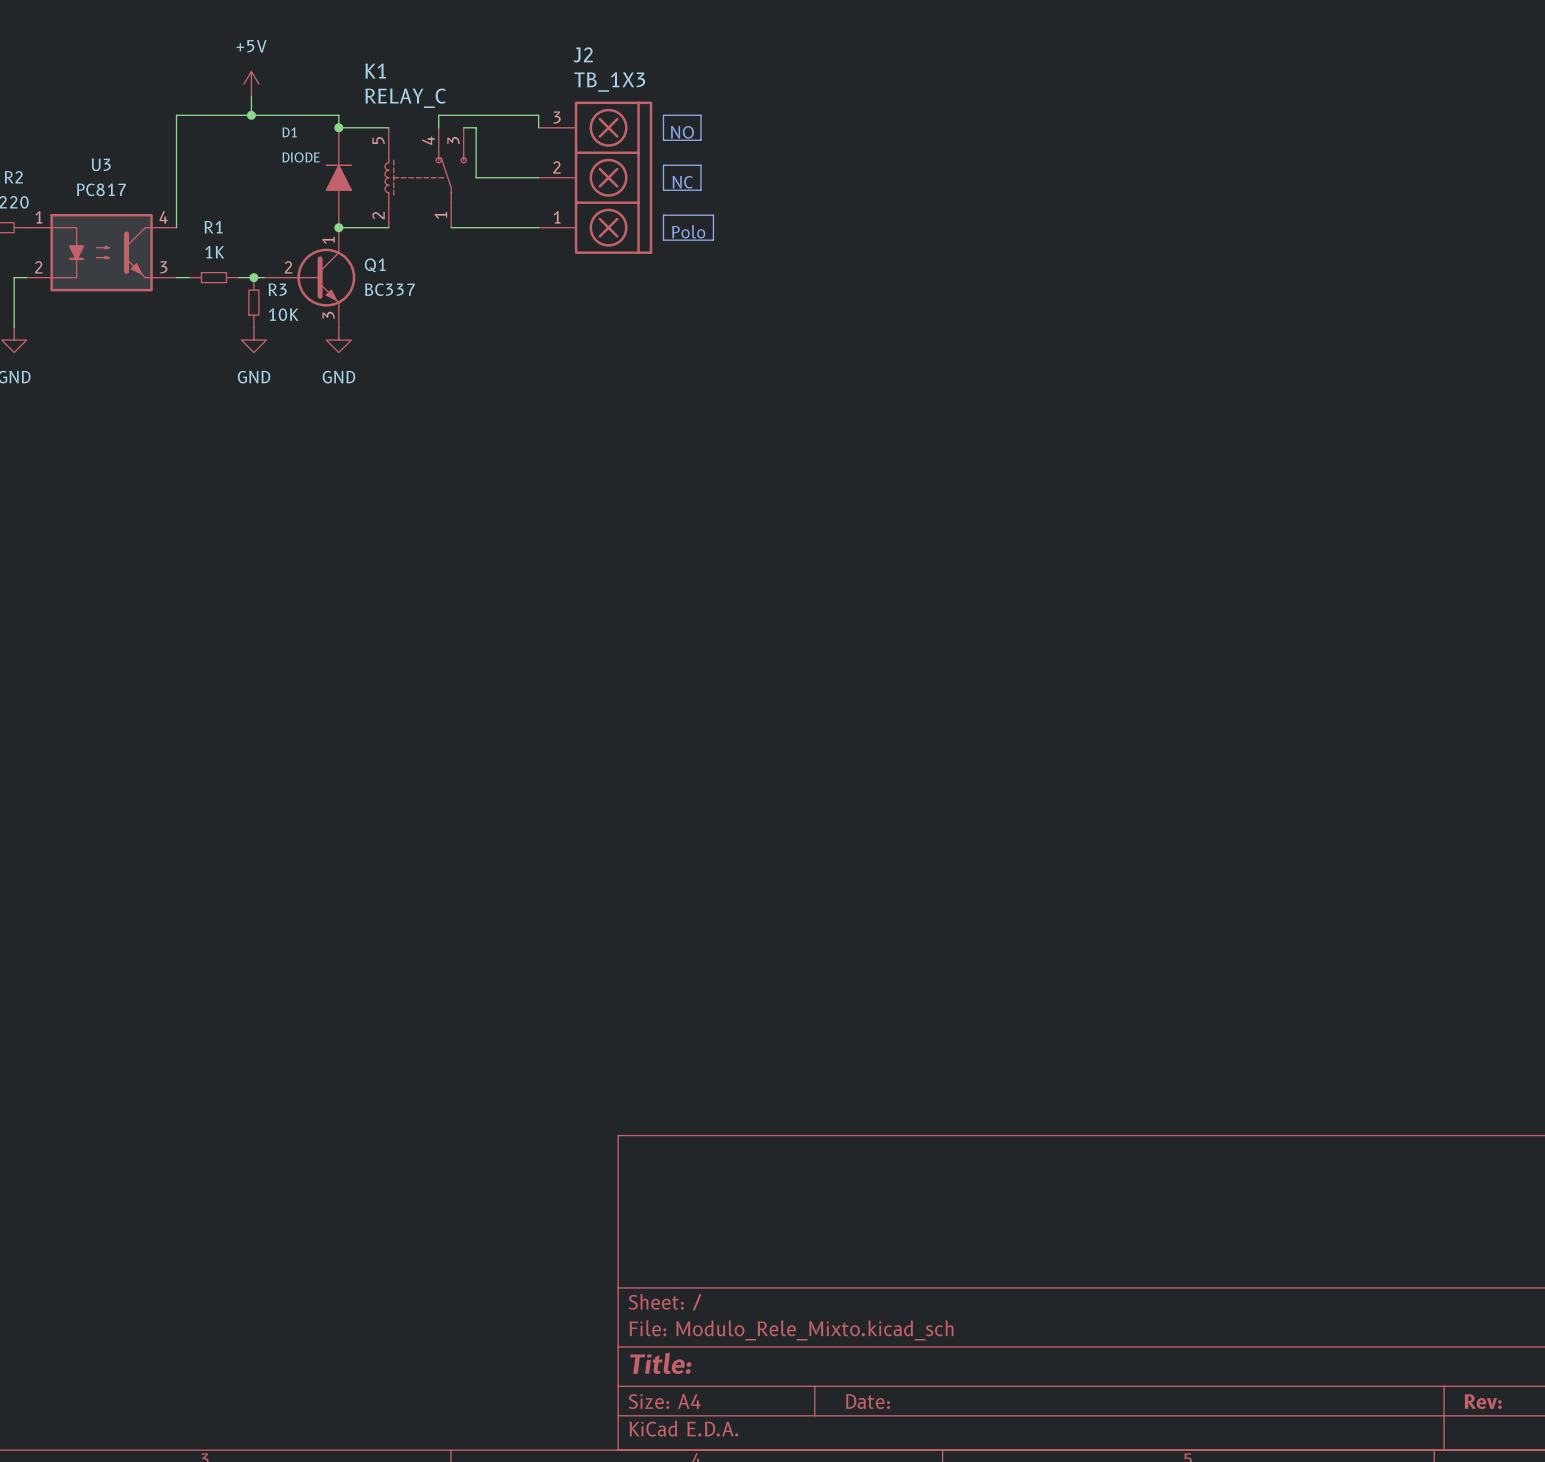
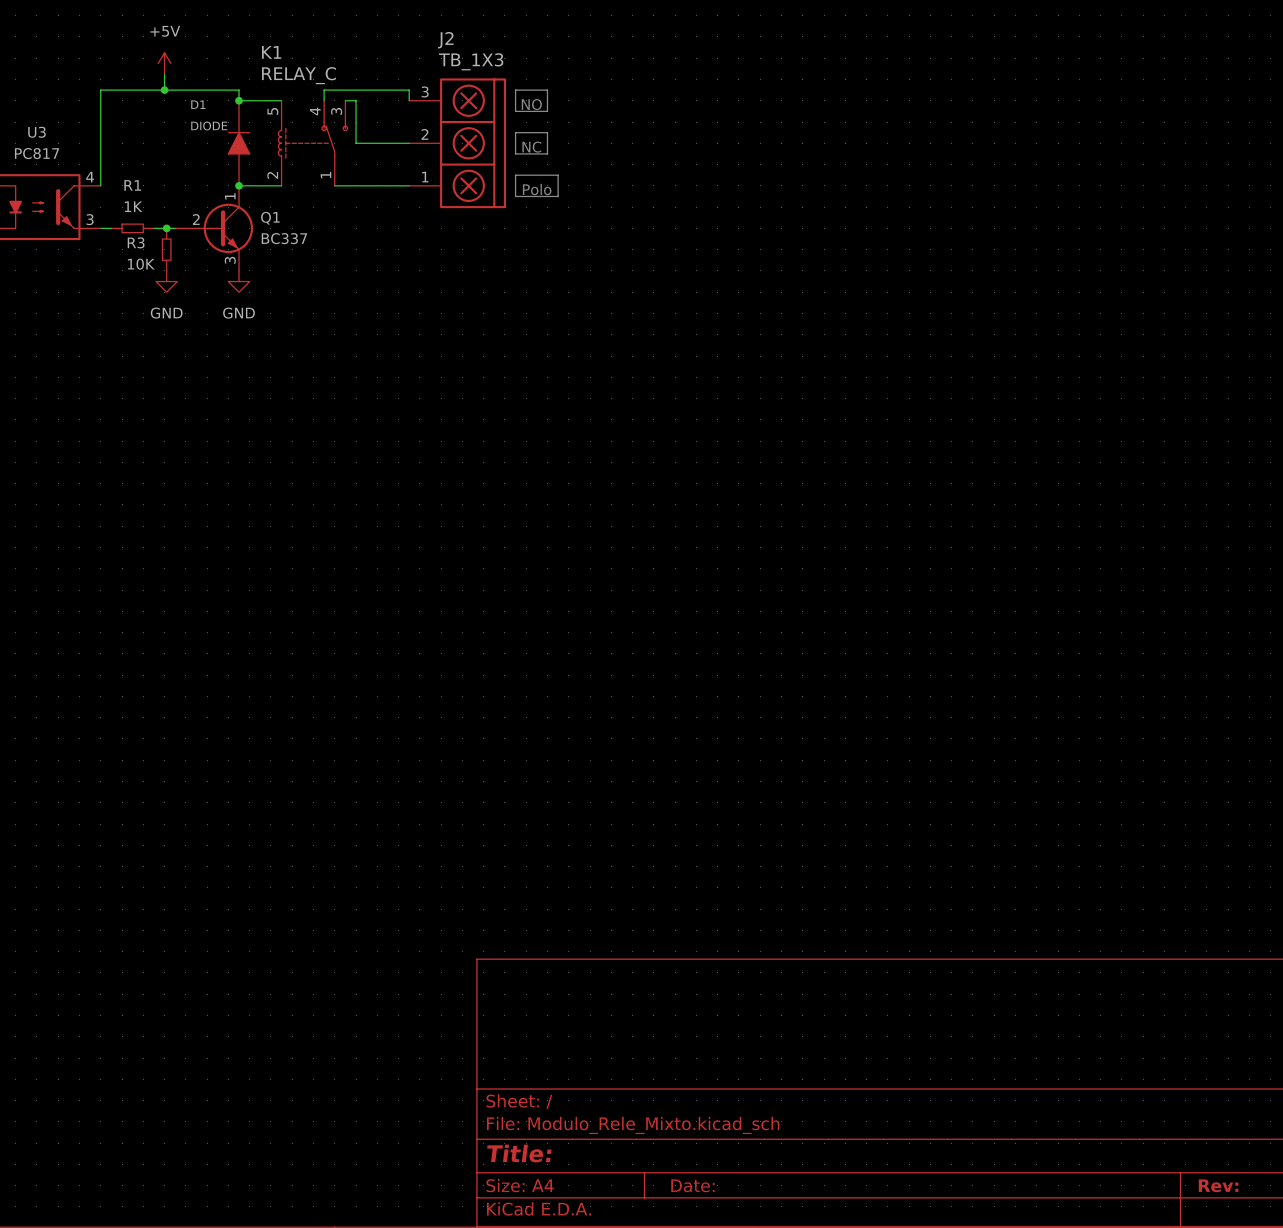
R3 name position: R3 (277, 289) -> R3 (136, 242)
R3 value position: 10K (283, 314) -> 10K (141, 264)

